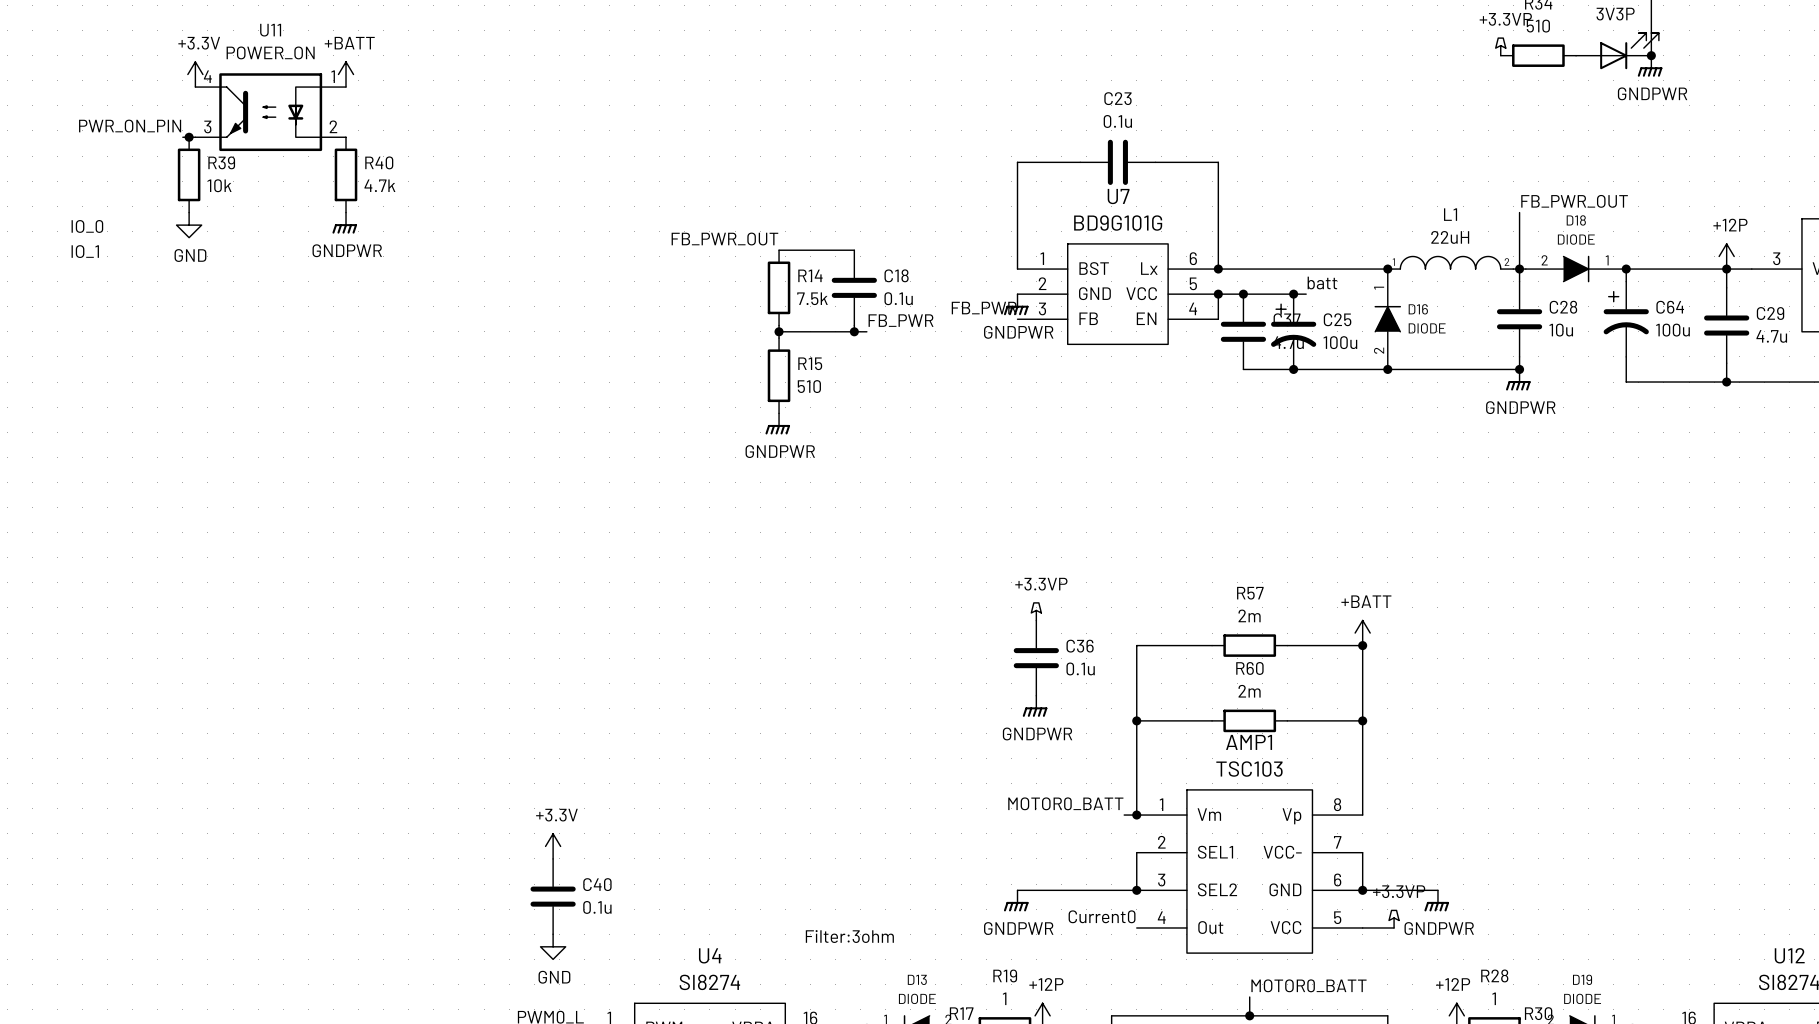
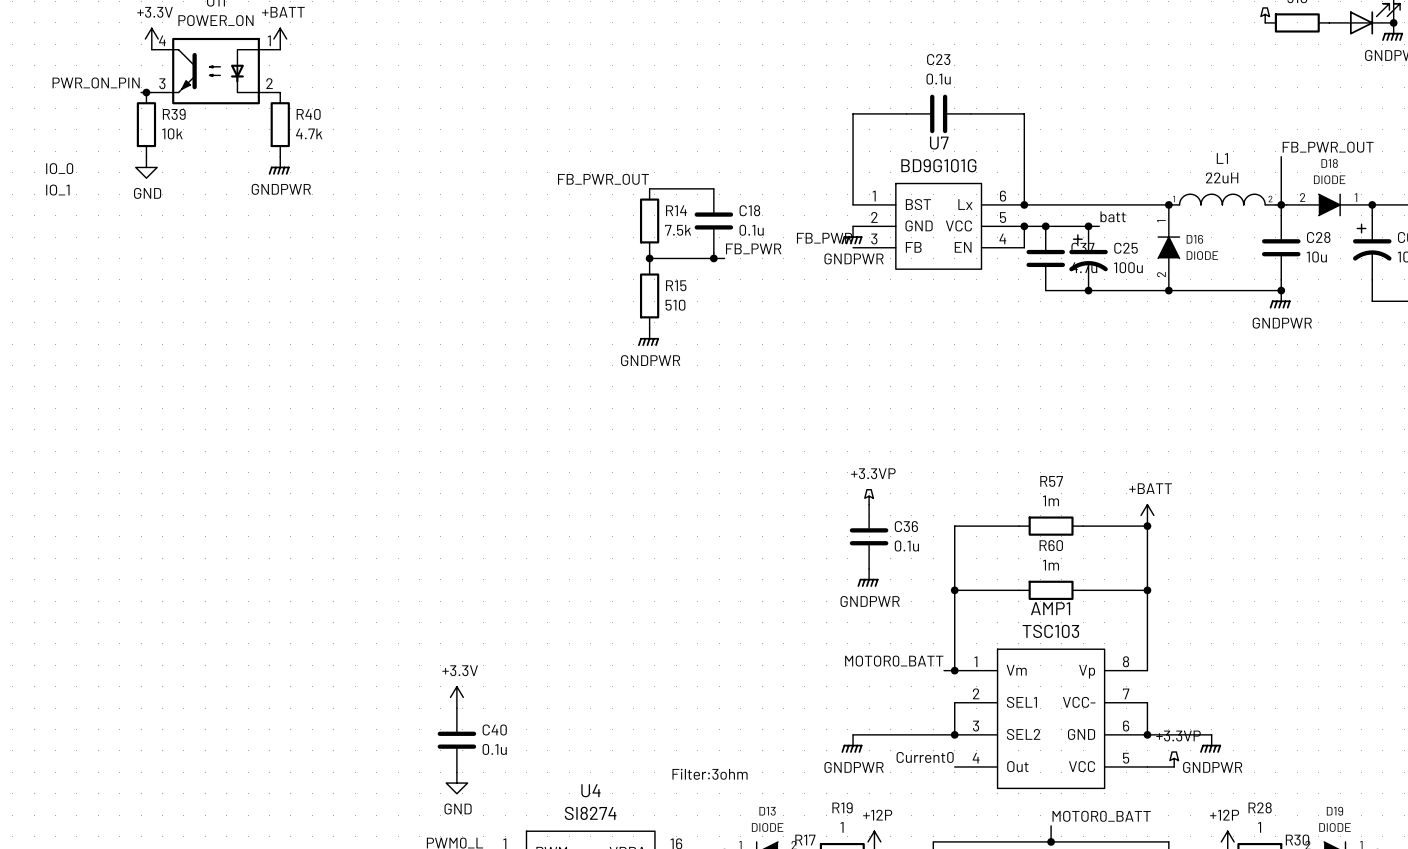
R57 value: 2m (1249, 615) -> 1m (1050, 500)
R60 value: 2m (1249, 691) -> 1m (1050, 565)

